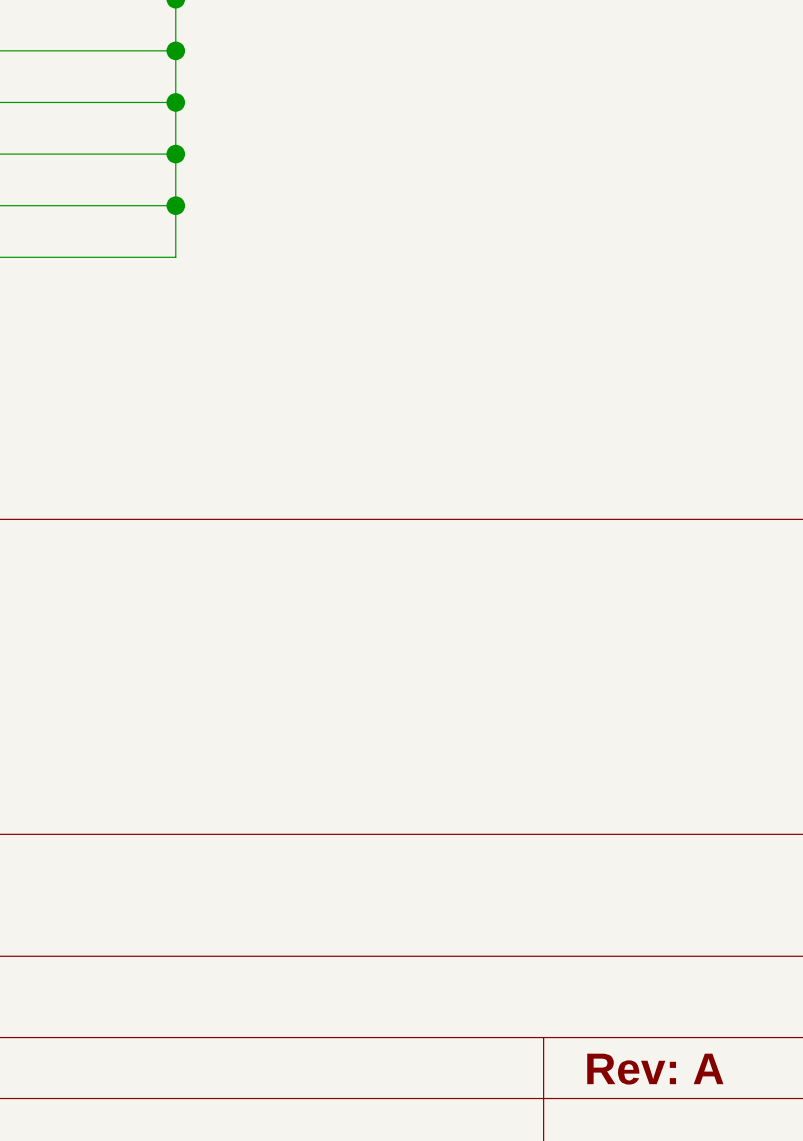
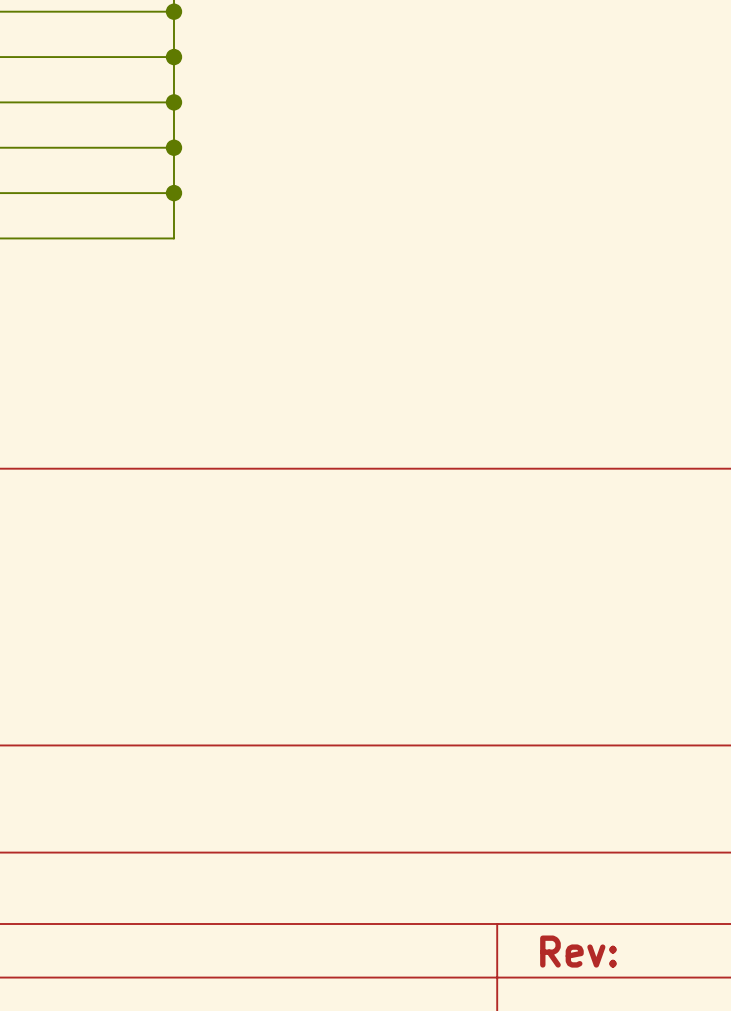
title block: Rev: A (655, 1069) -> Rev: (578, 951)

